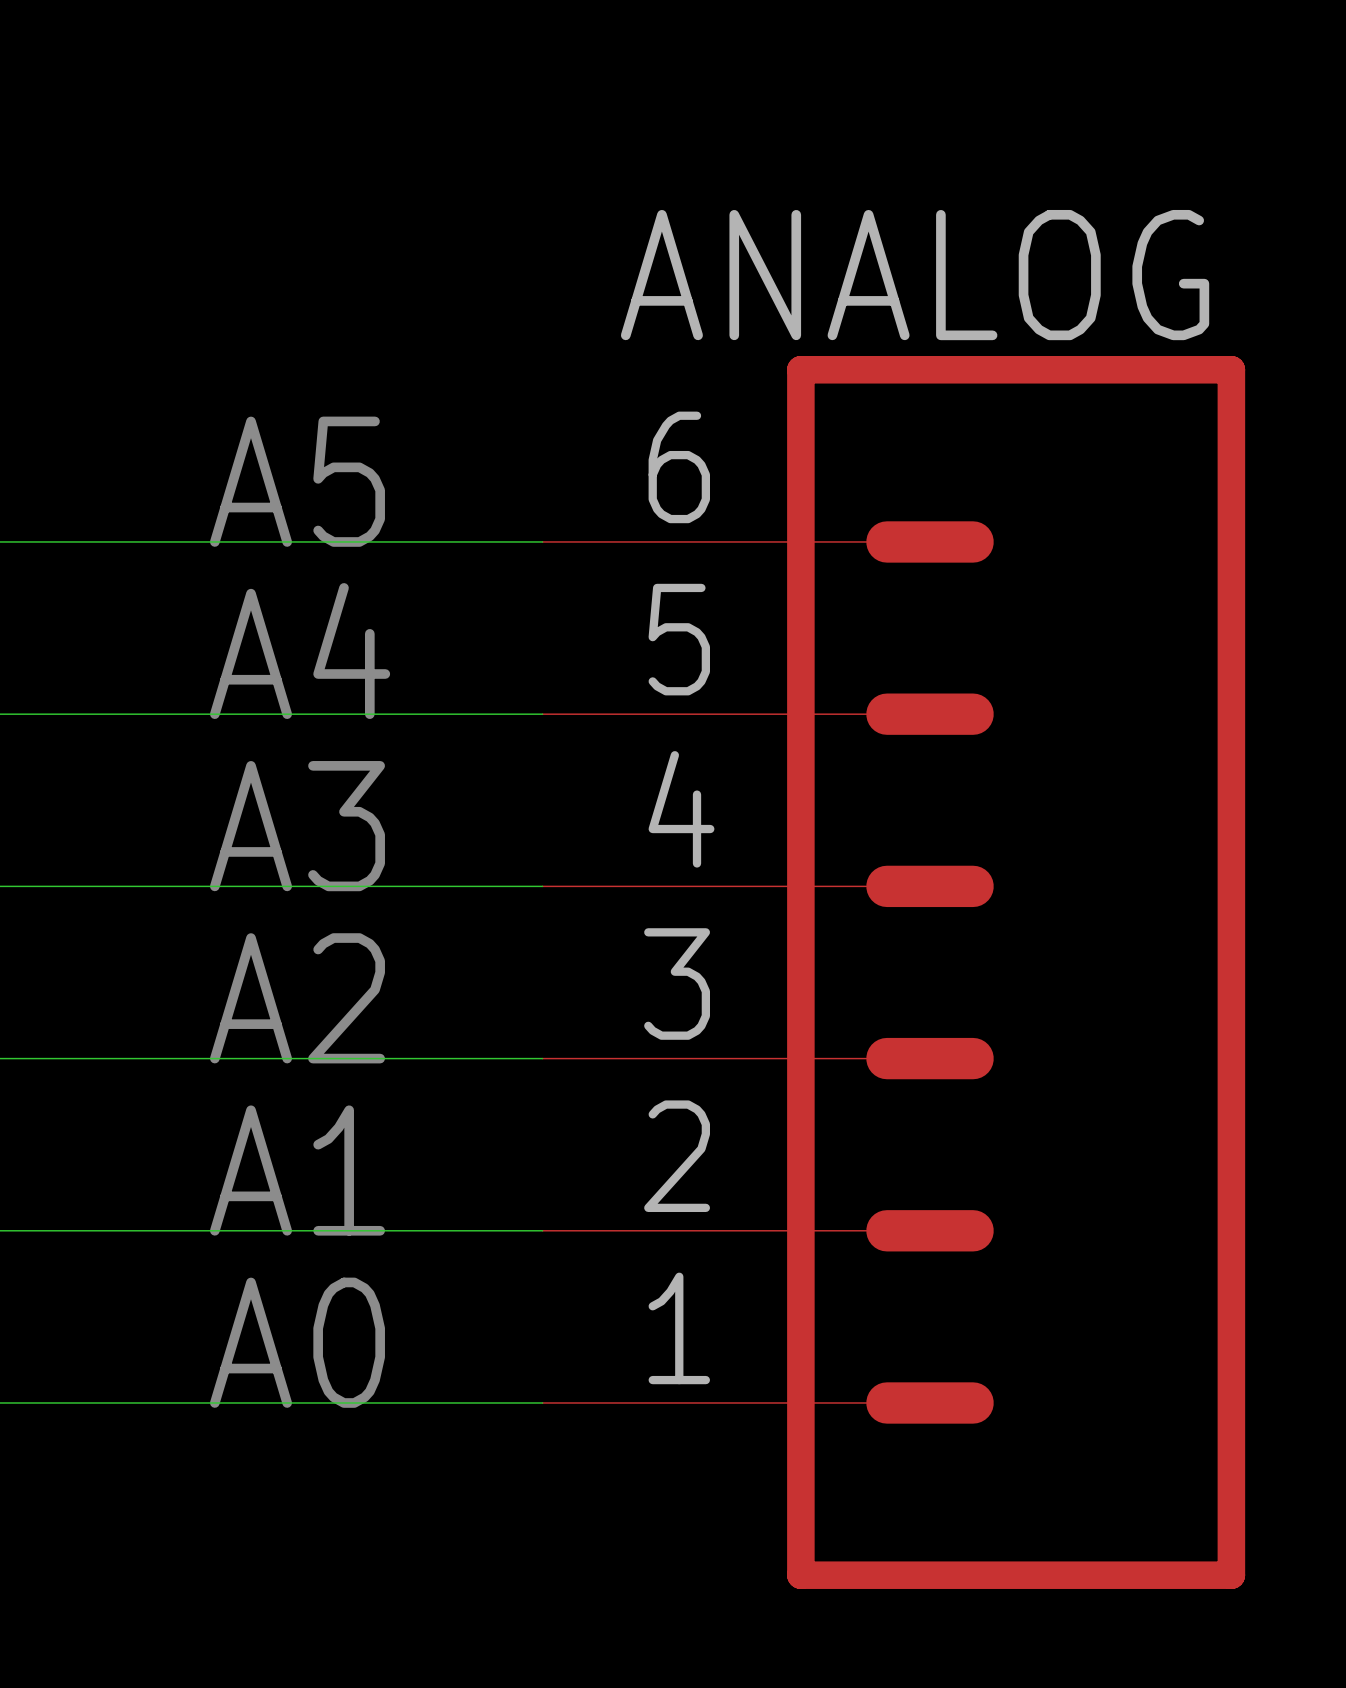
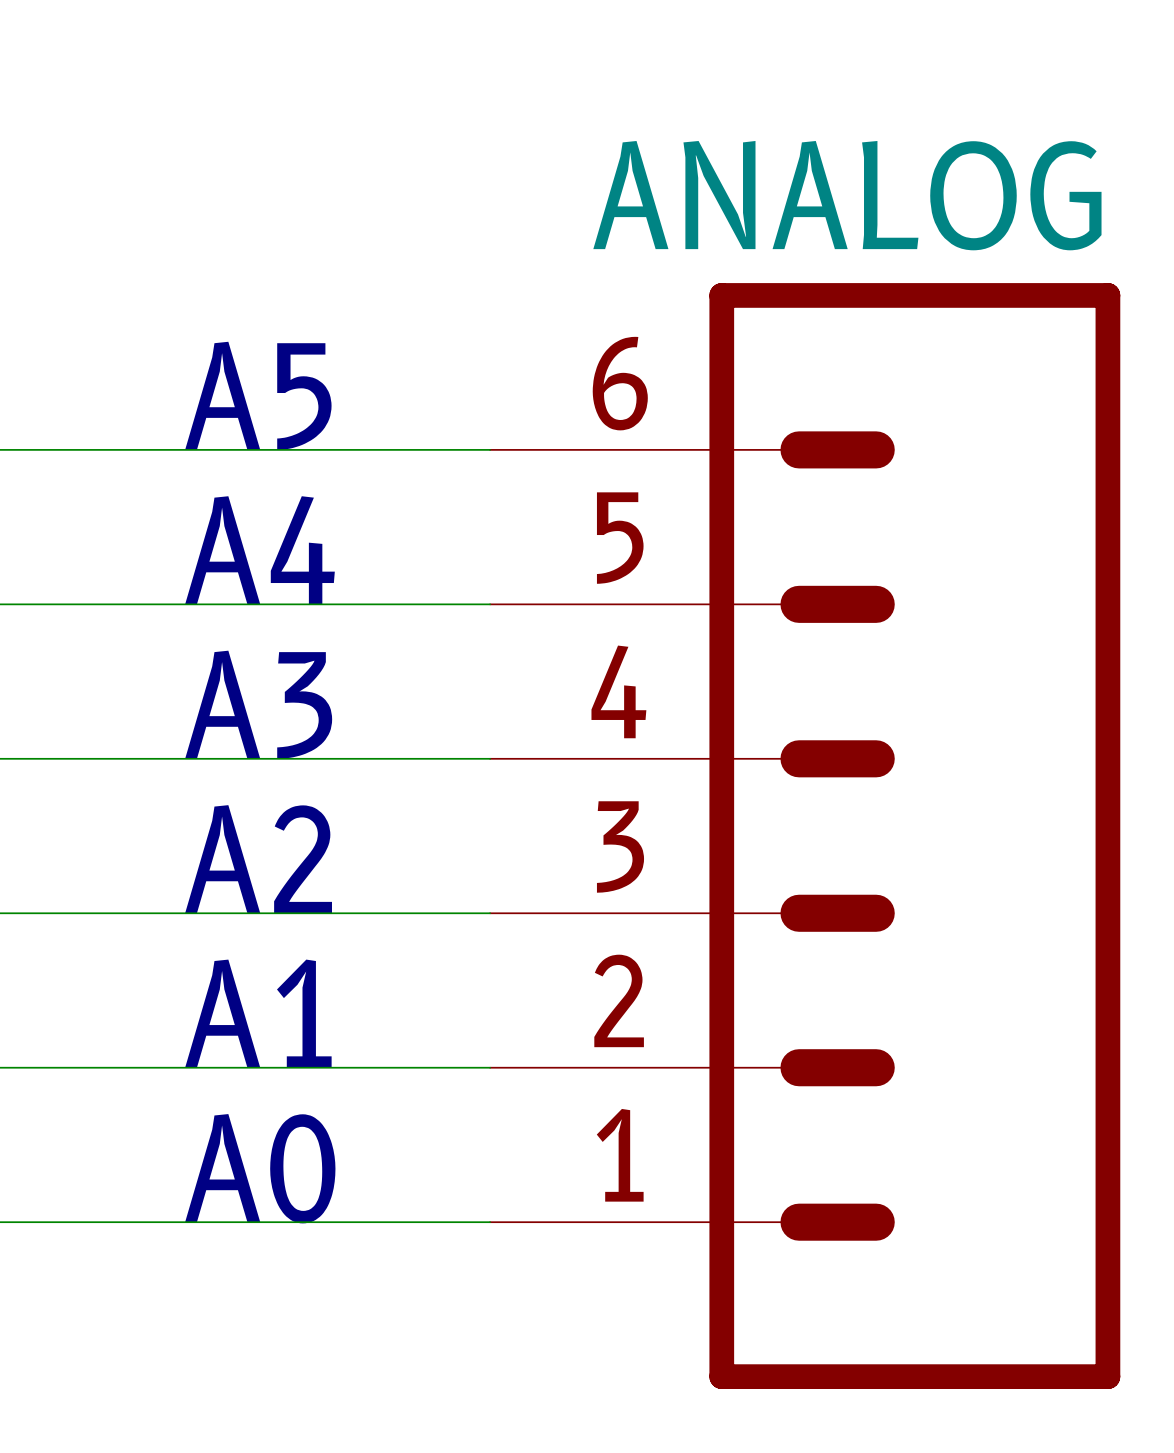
ANALOG name position: ANALOG (915, 275) -> ANALOG (847, 195)

